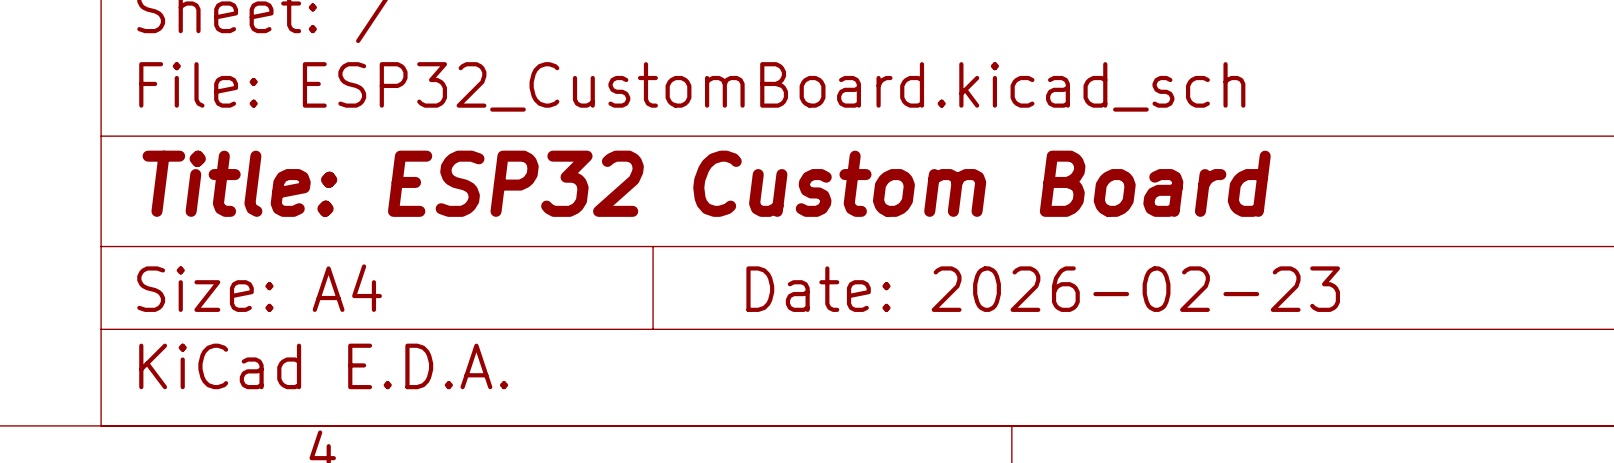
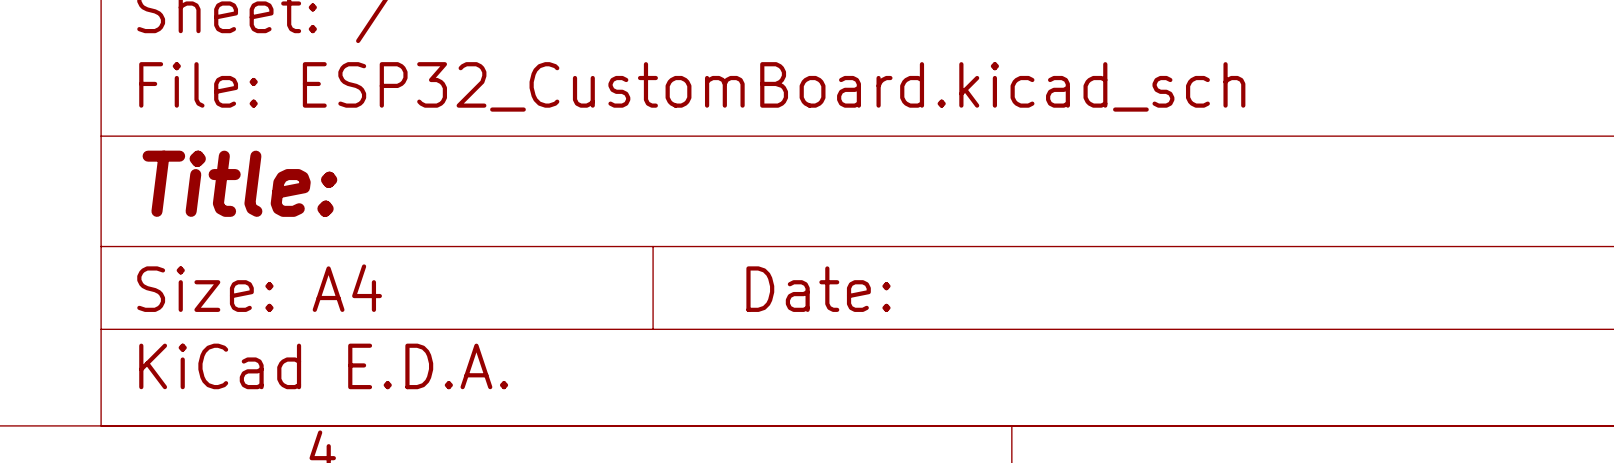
title block: Title: ESP32 Custom Board (706, 183) -> Title: (239, 183)
title block: Date: 2026-02-23 (1043, 289) -> Date: (818, 289)

